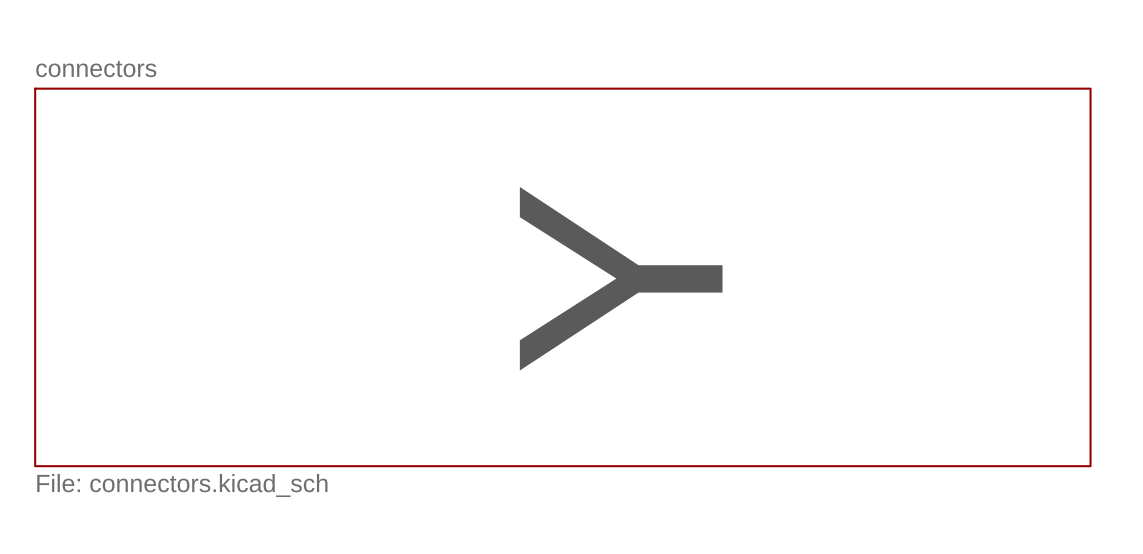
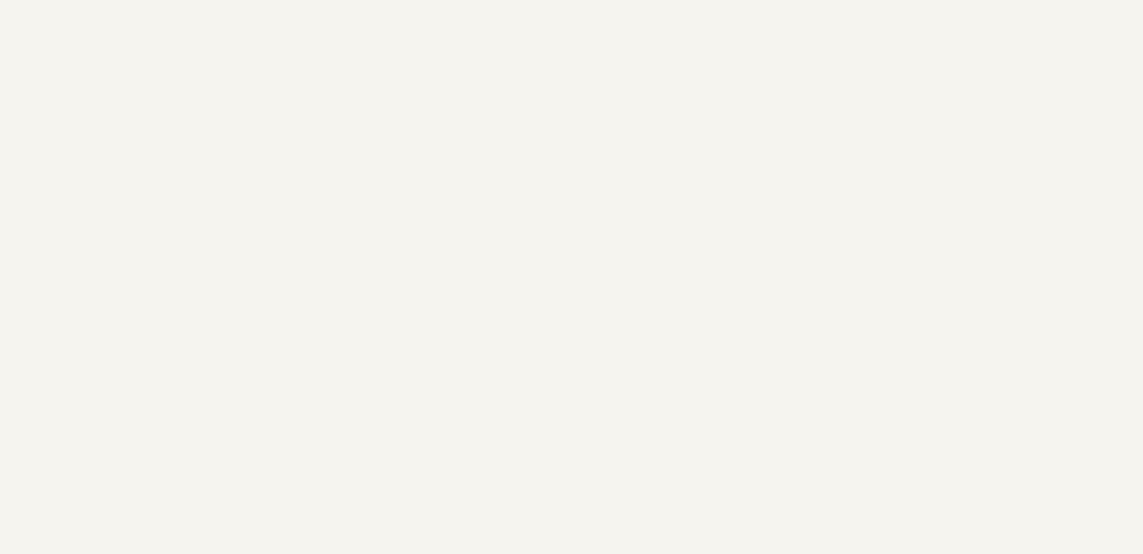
sheet connectors: File: connectors.kicad_sch (562, 277) -> none
text: Y (621, 278) -> none

